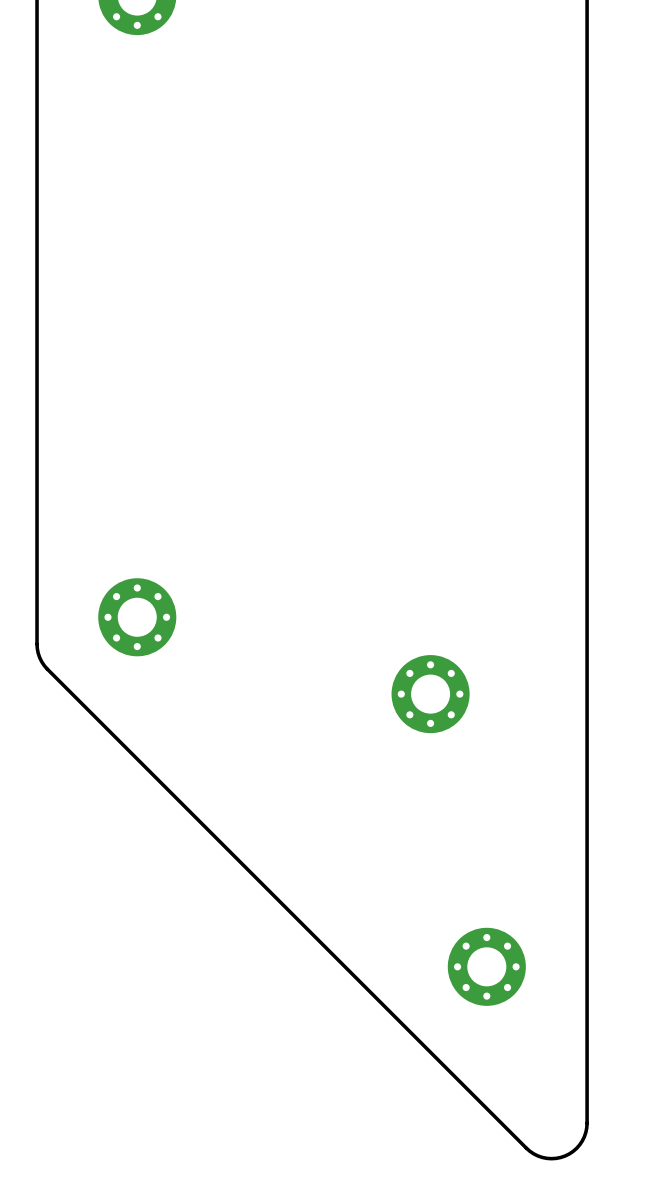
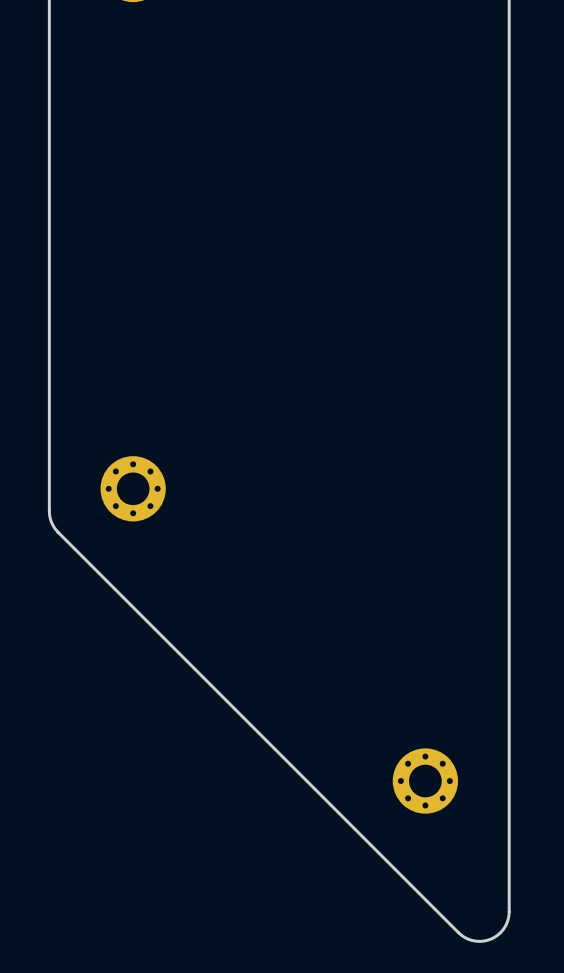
part: (430, 694) -> none

